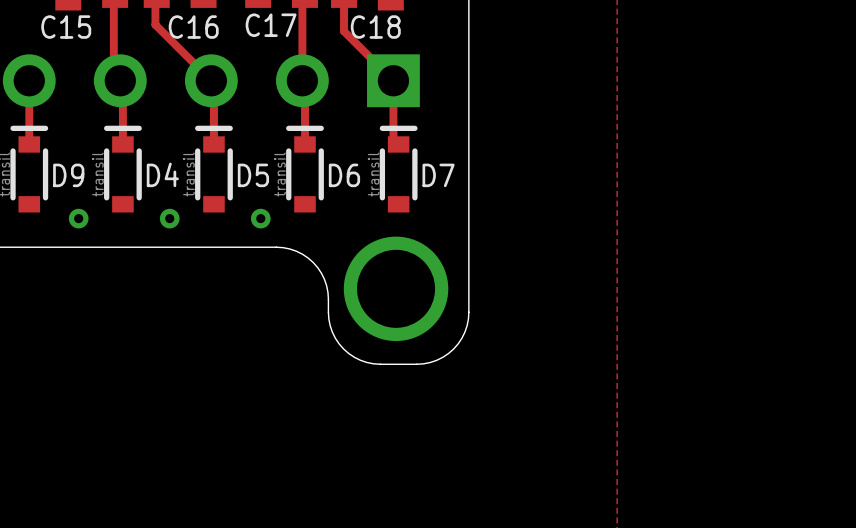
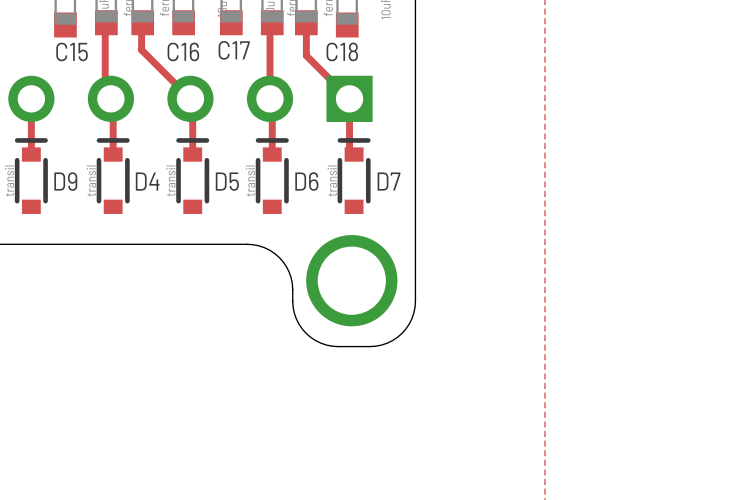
via: (78, 218) -> none
via: (169, 218) -> none
via: (260, 218) -> none

